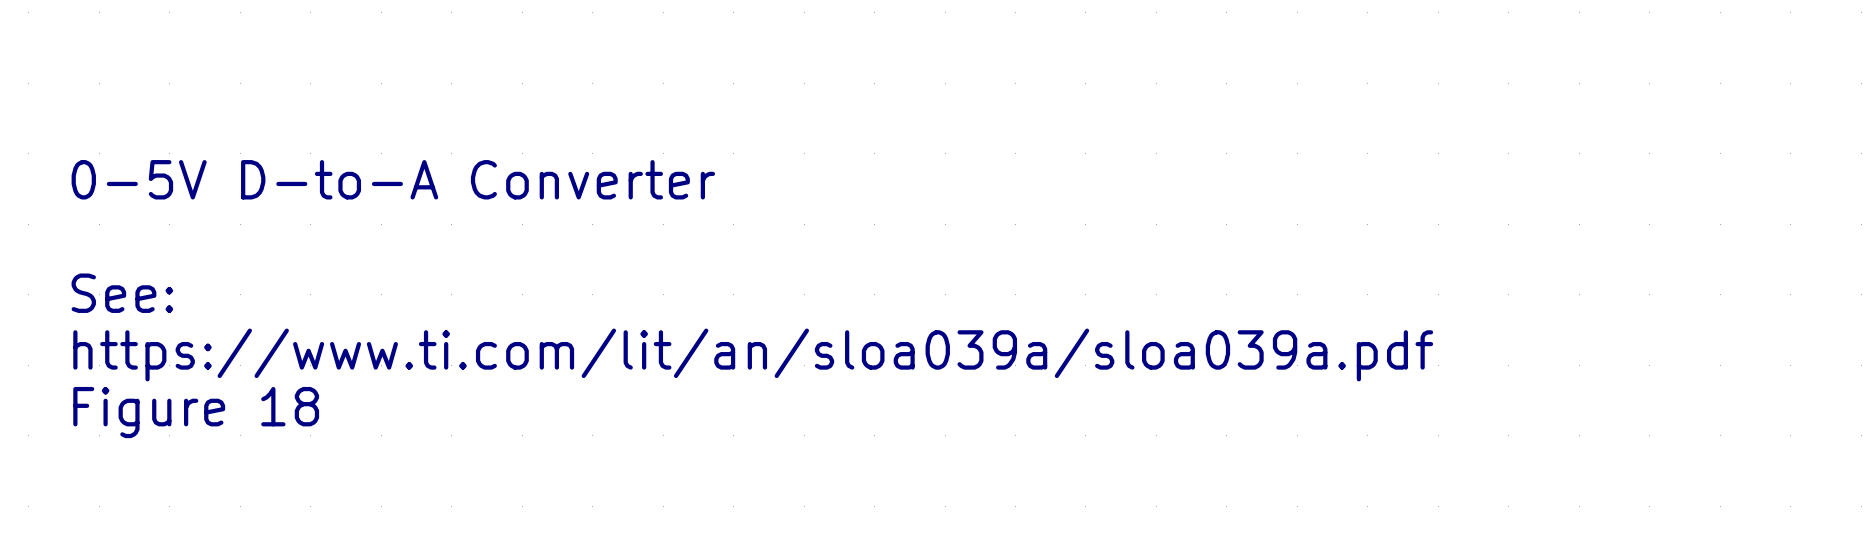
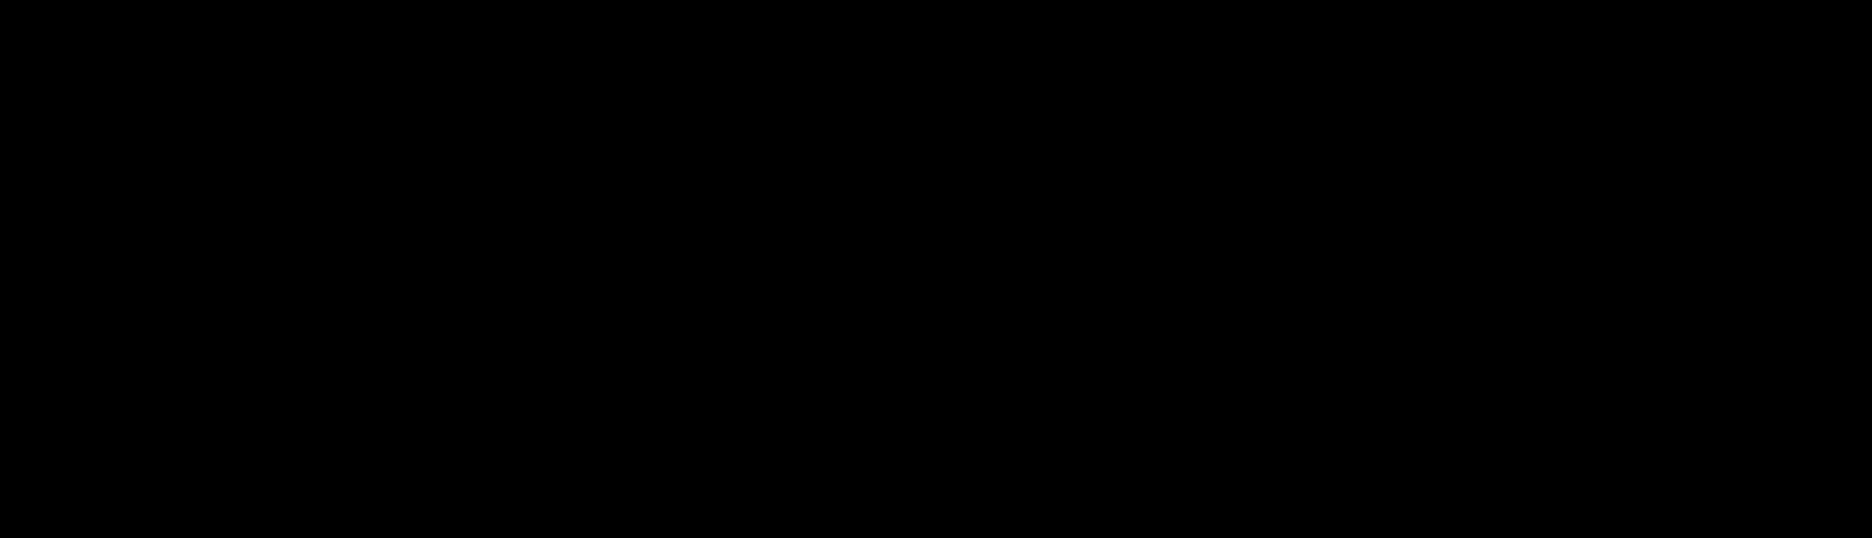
text: 0-5V D-to-A Converter (393, 179) -> none
text: See: (122, 293) -> none
text: https://www.ti.com/lit/an/sloa039a/sloa039a.pdf (753, 354) -> none
text: Figure 18 (196, 412) -> none

